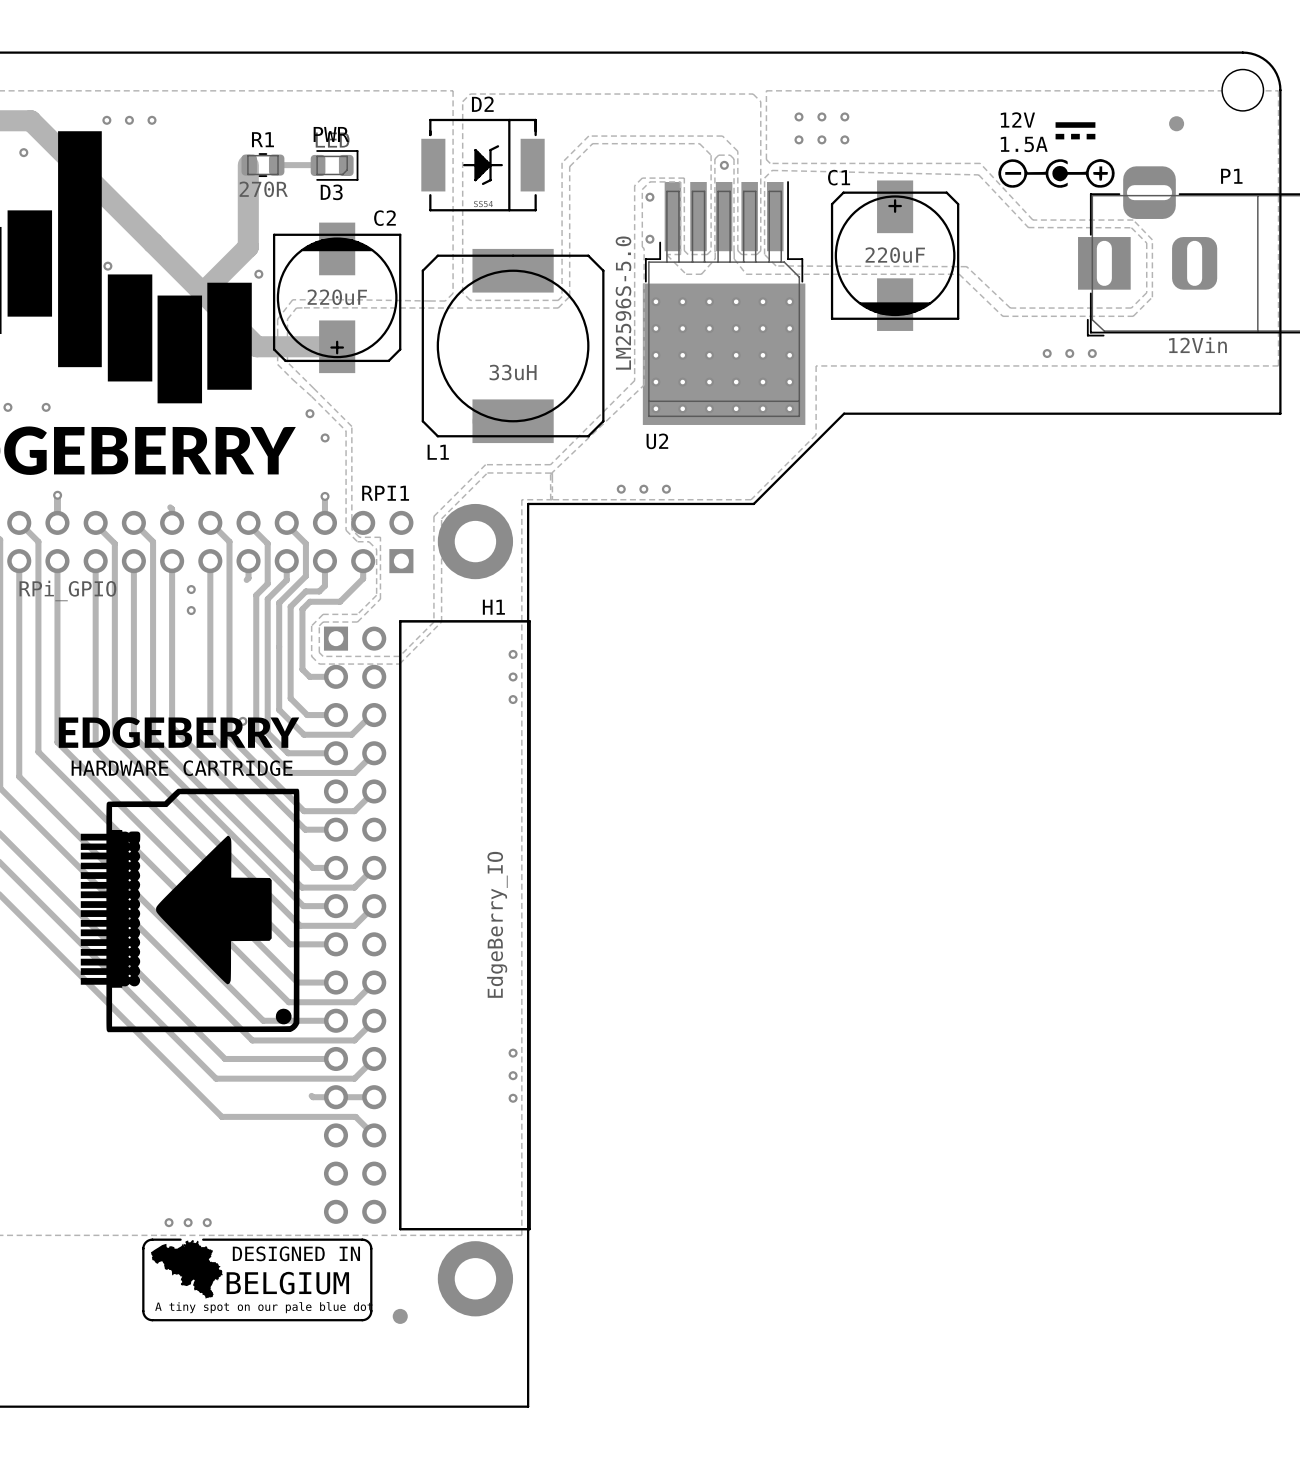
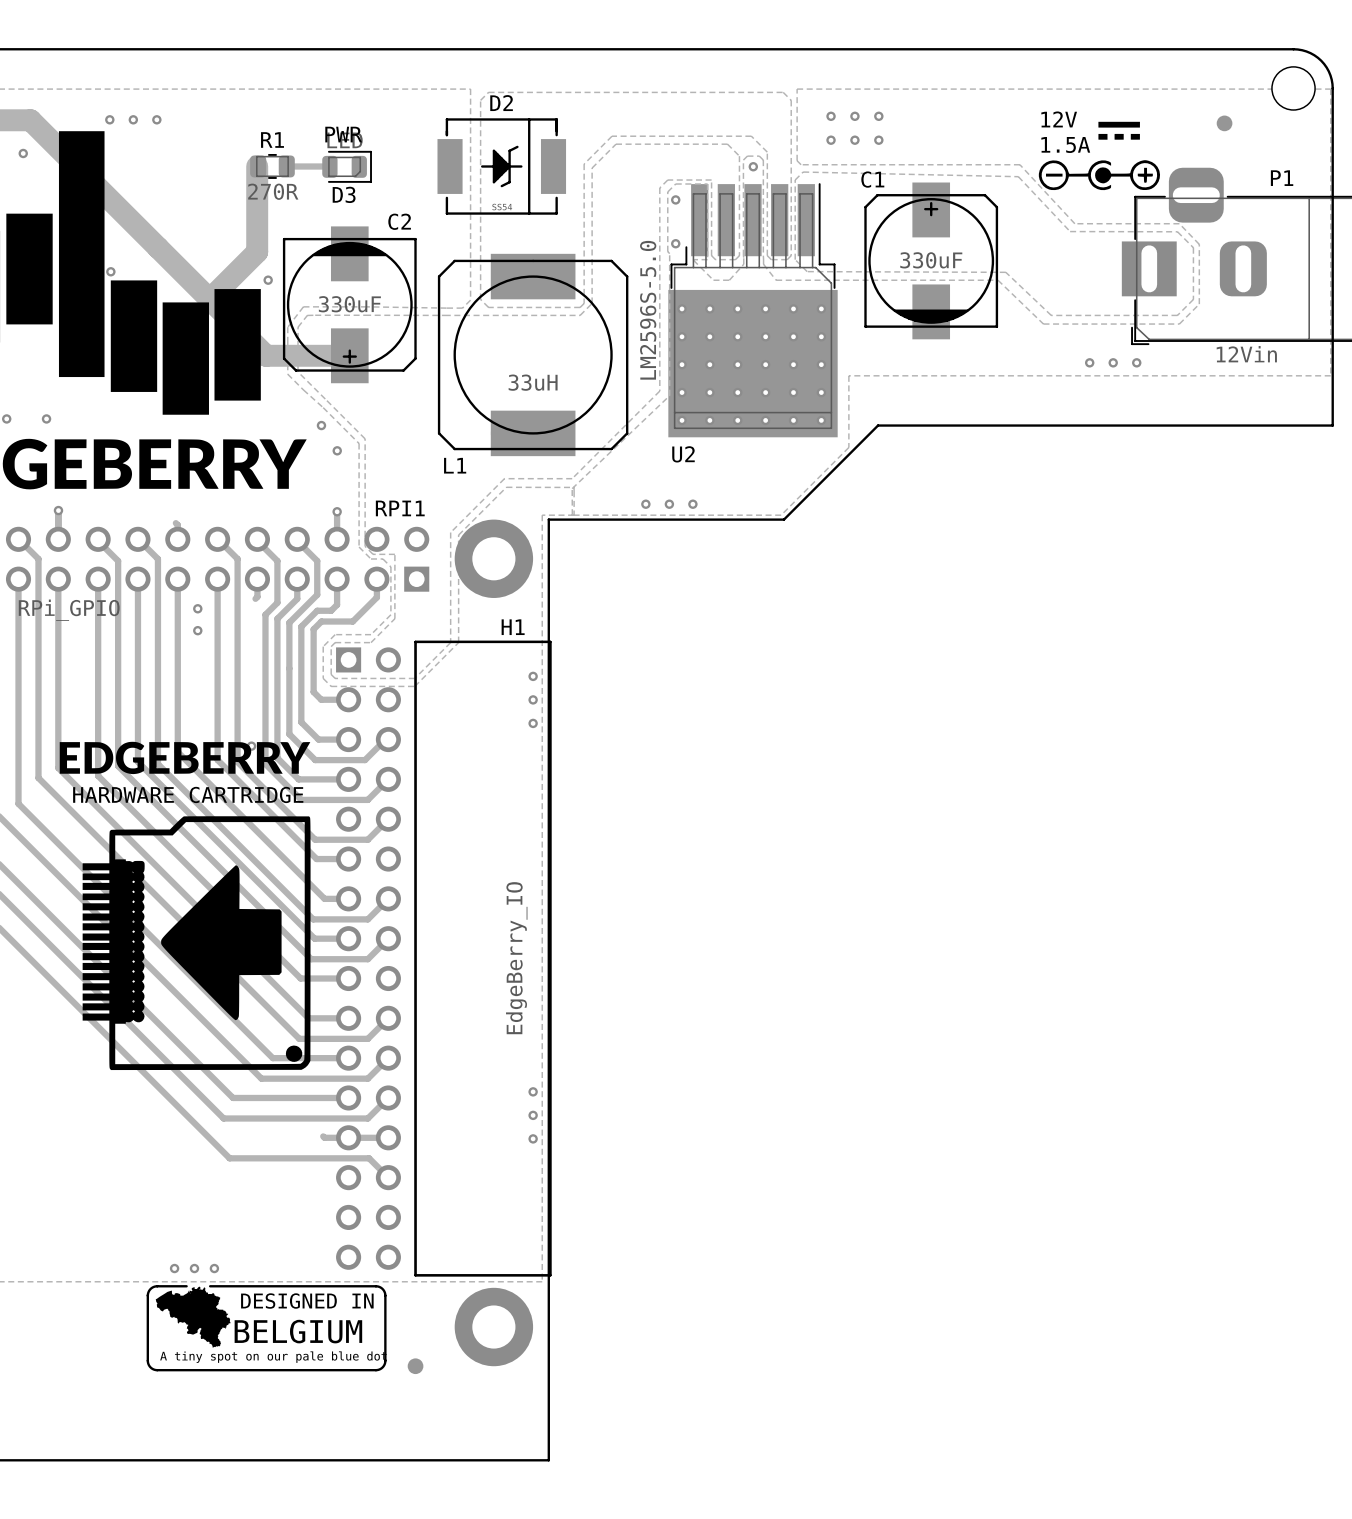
C1 value: 220uF (895, 255) -> 330uF (931, 260)
C2 value: 220uF (337, 297) -> 330uF (349, 304)

